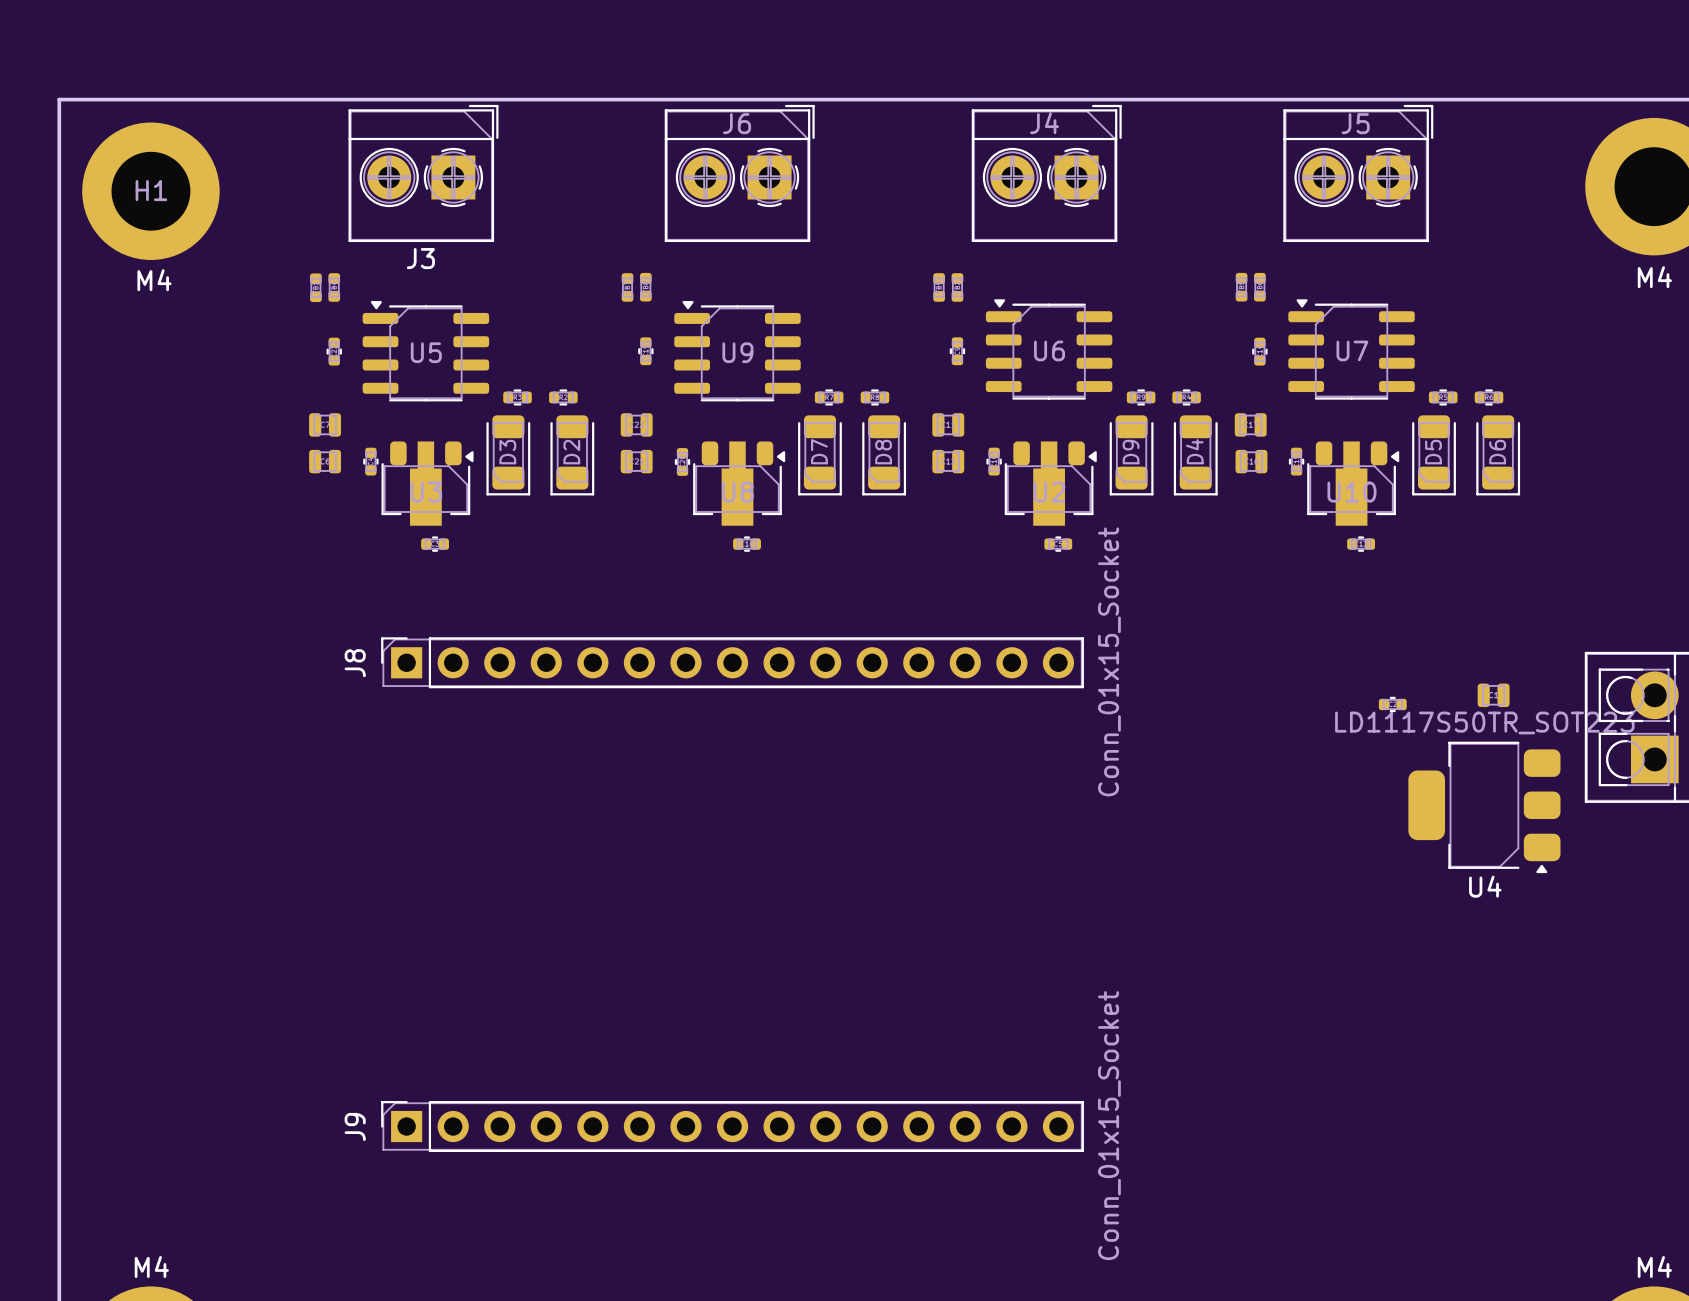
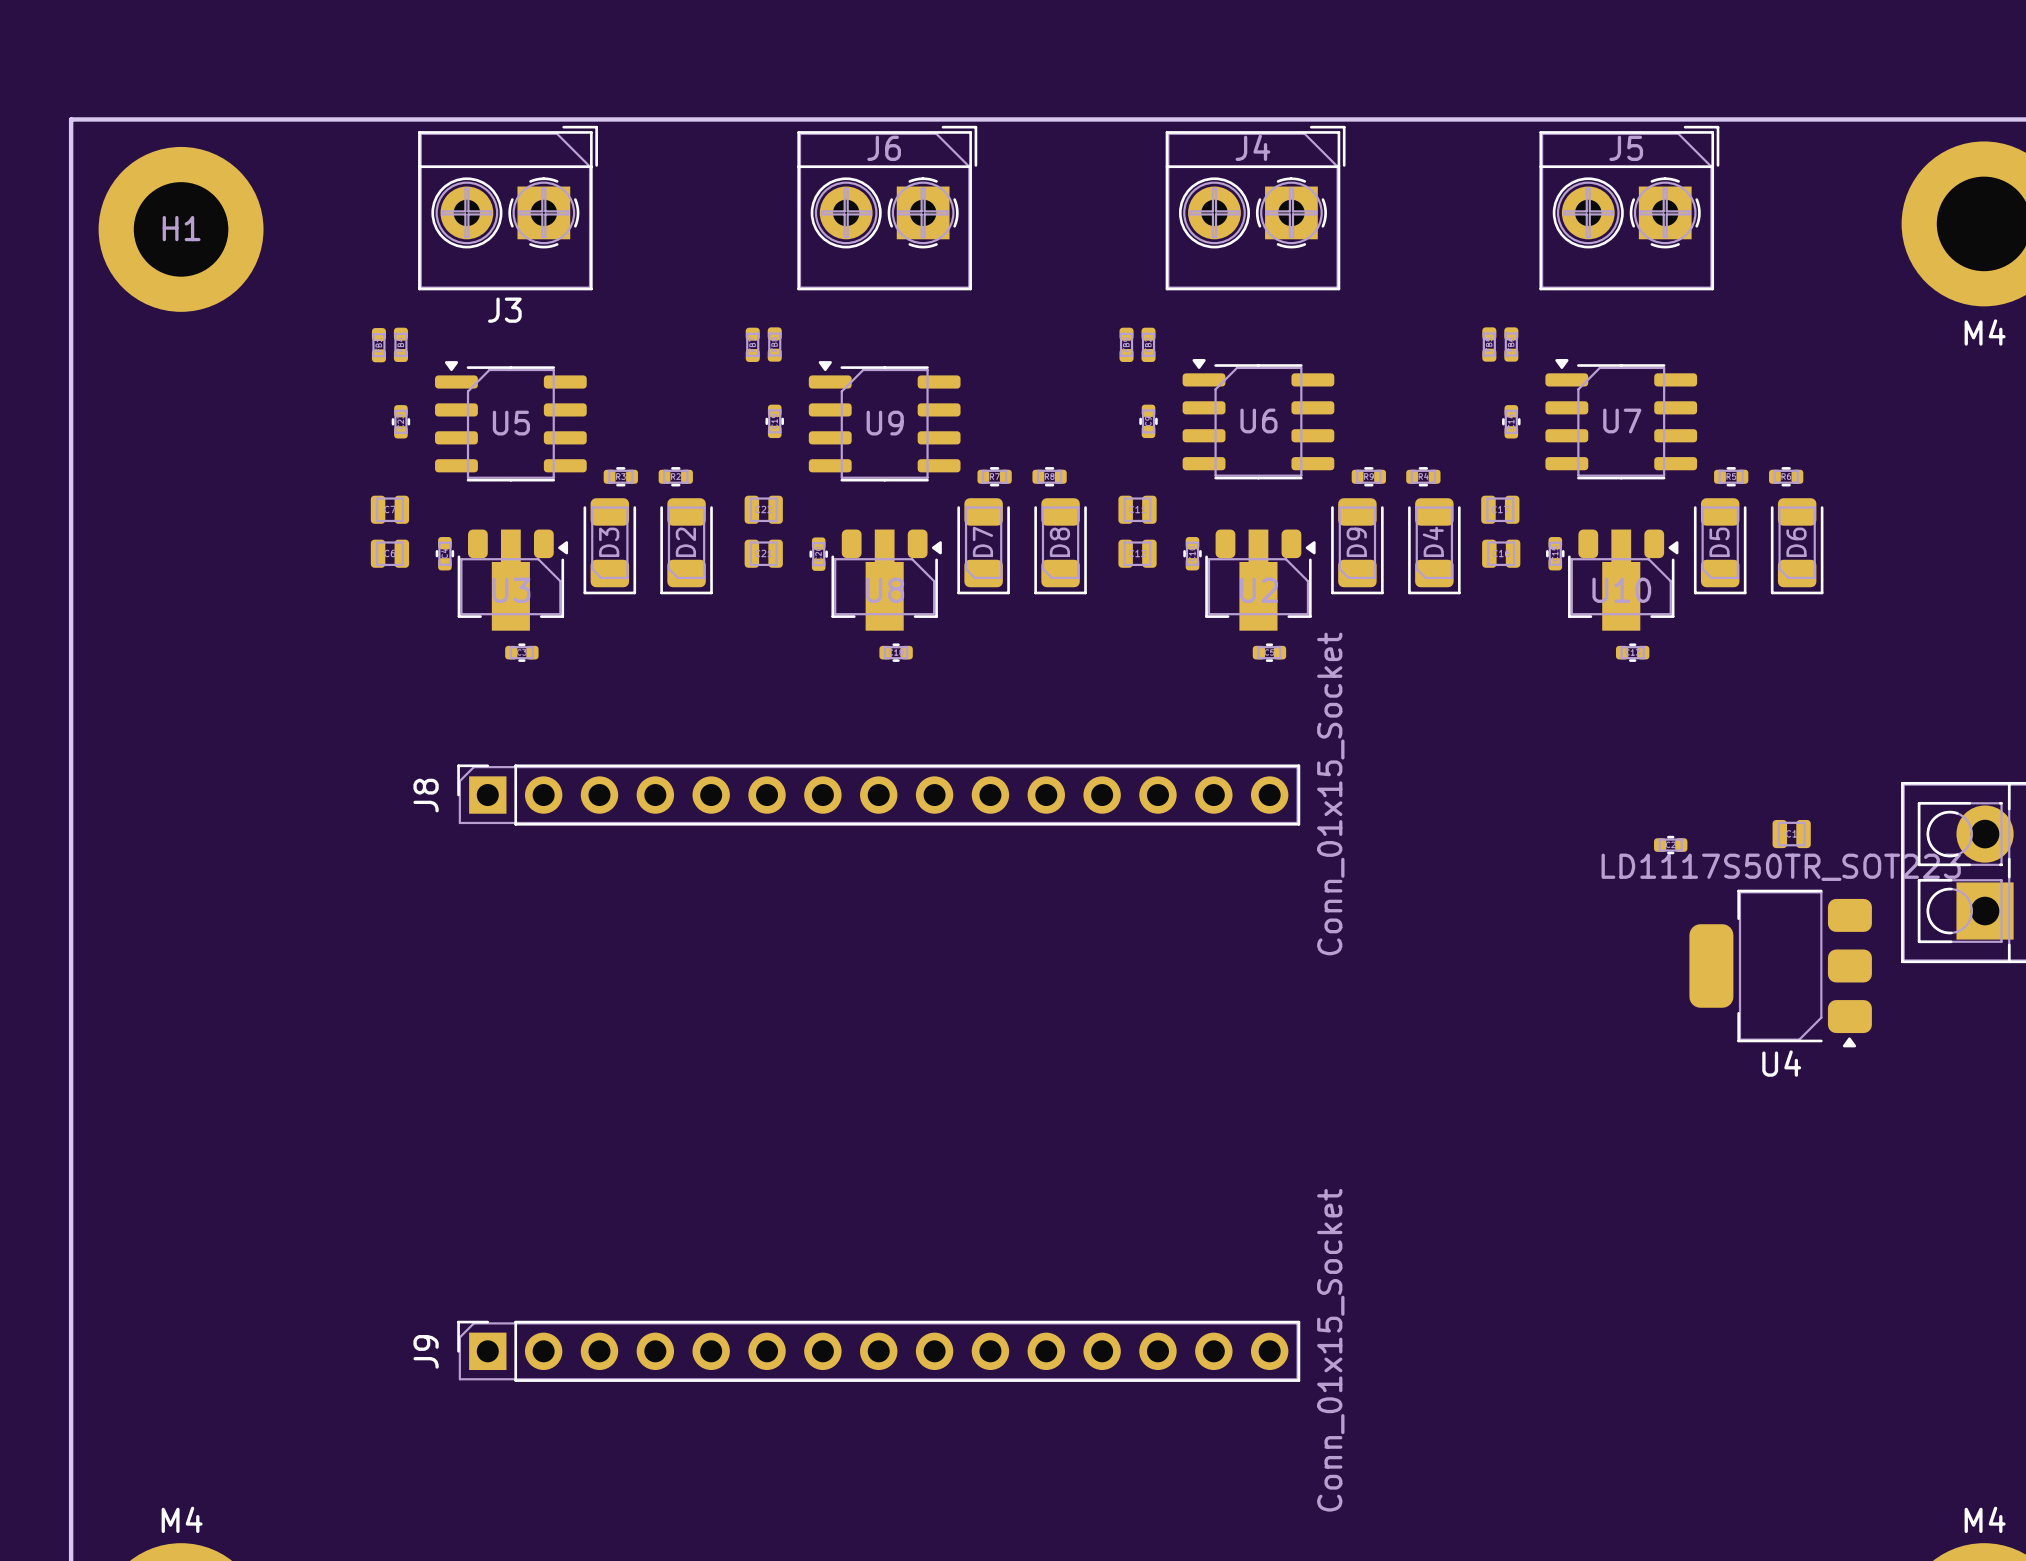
text: M4 (154, 280) -> none

